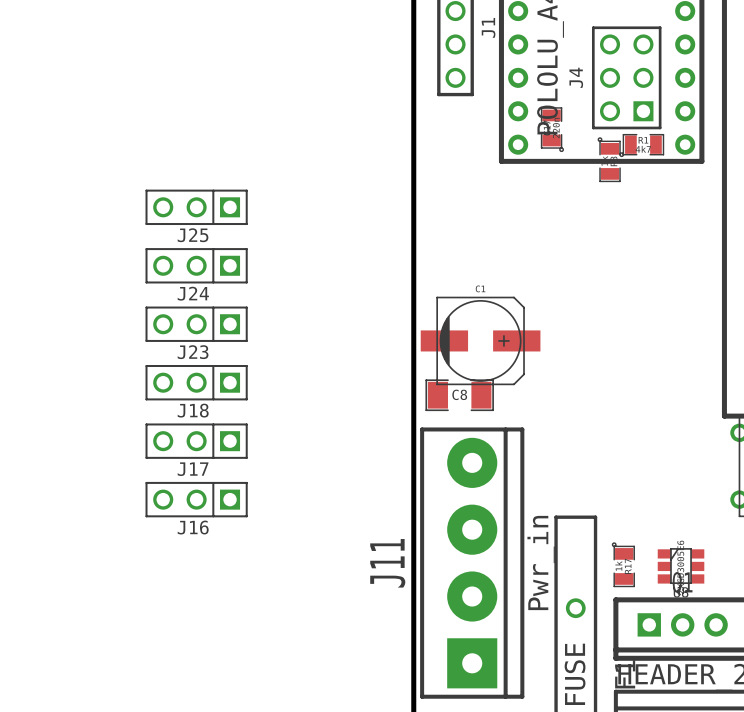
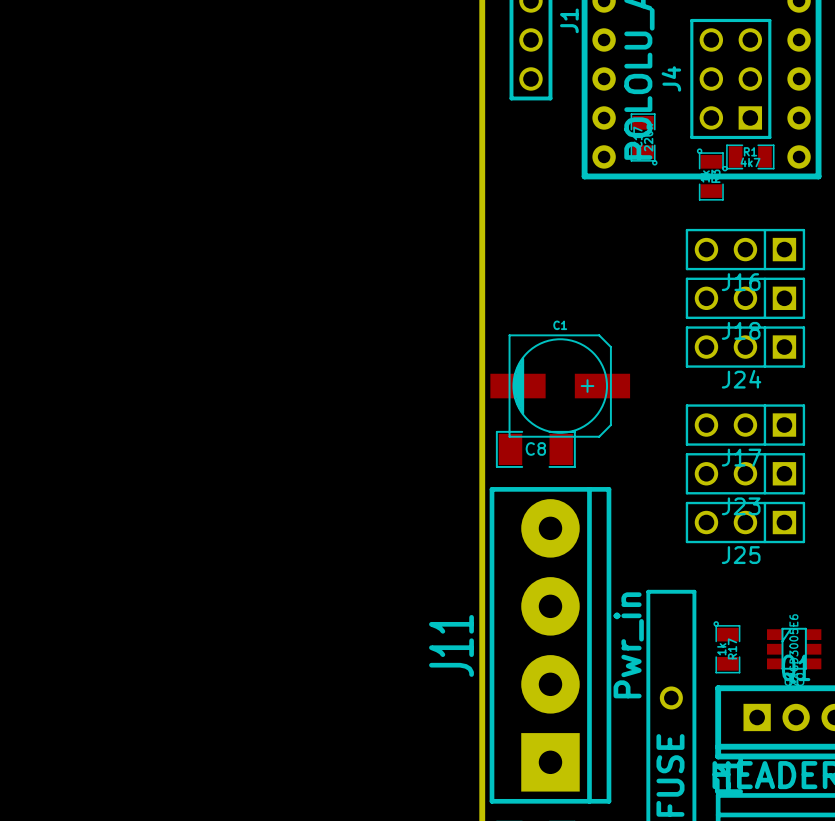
J25 position: (196, 207) -> (745, 522)
J24 position: (196, 265) -> (745, 347)
J23 position: (196, 324) -> (745, 473)
J18 position: (196, 382) -> (745, 298)
J17 position: (196, 441) -> (745, 425)
J16 position: (196, 499) -> (745, 249)

